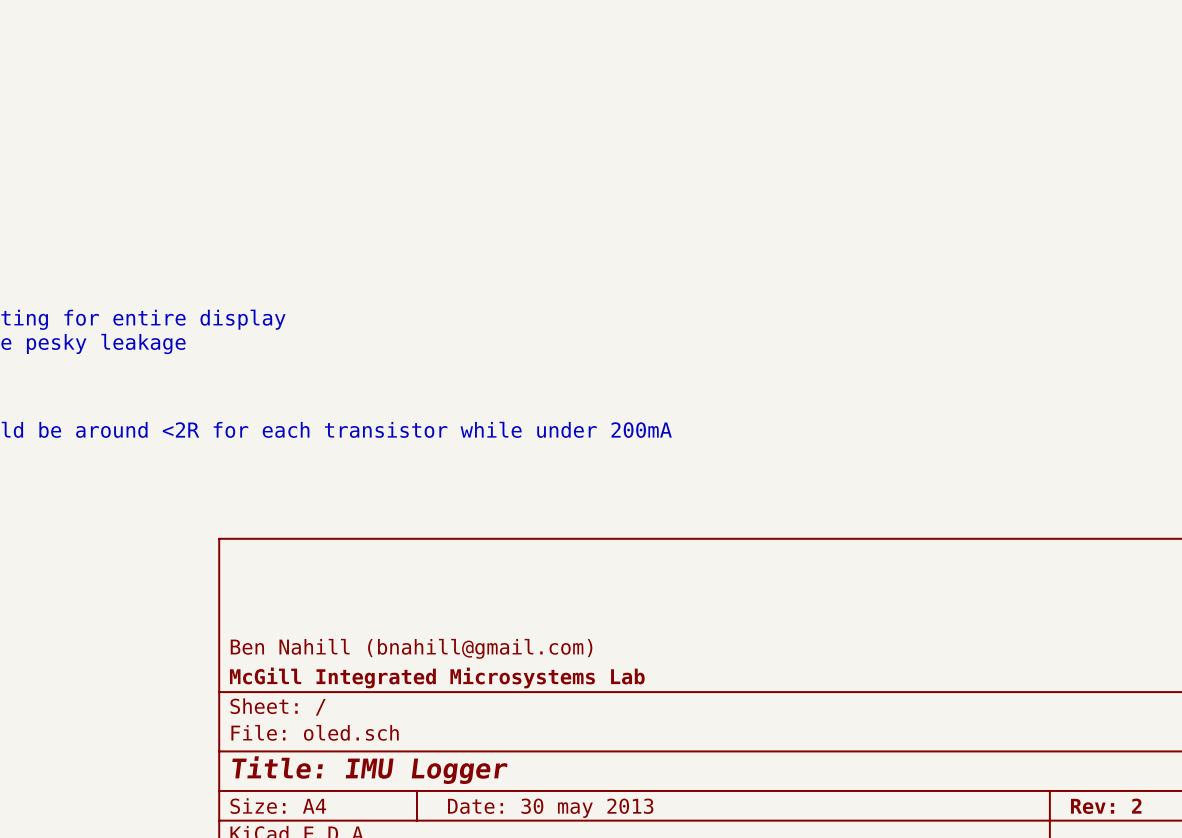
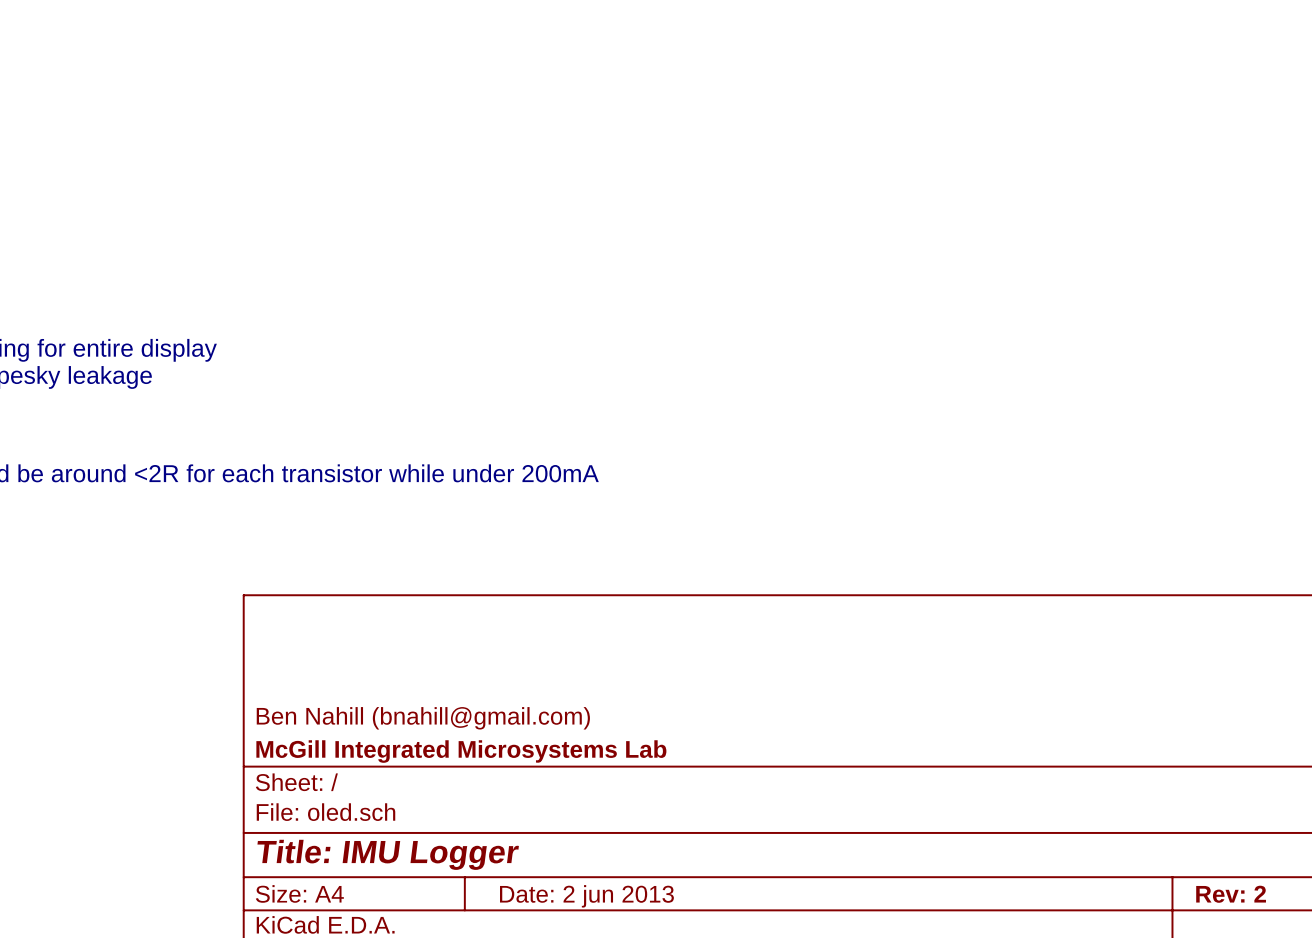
title block: Date: 30 may 2013 (550, 808) -> Date: 2 jun 2013 (586, 896)

